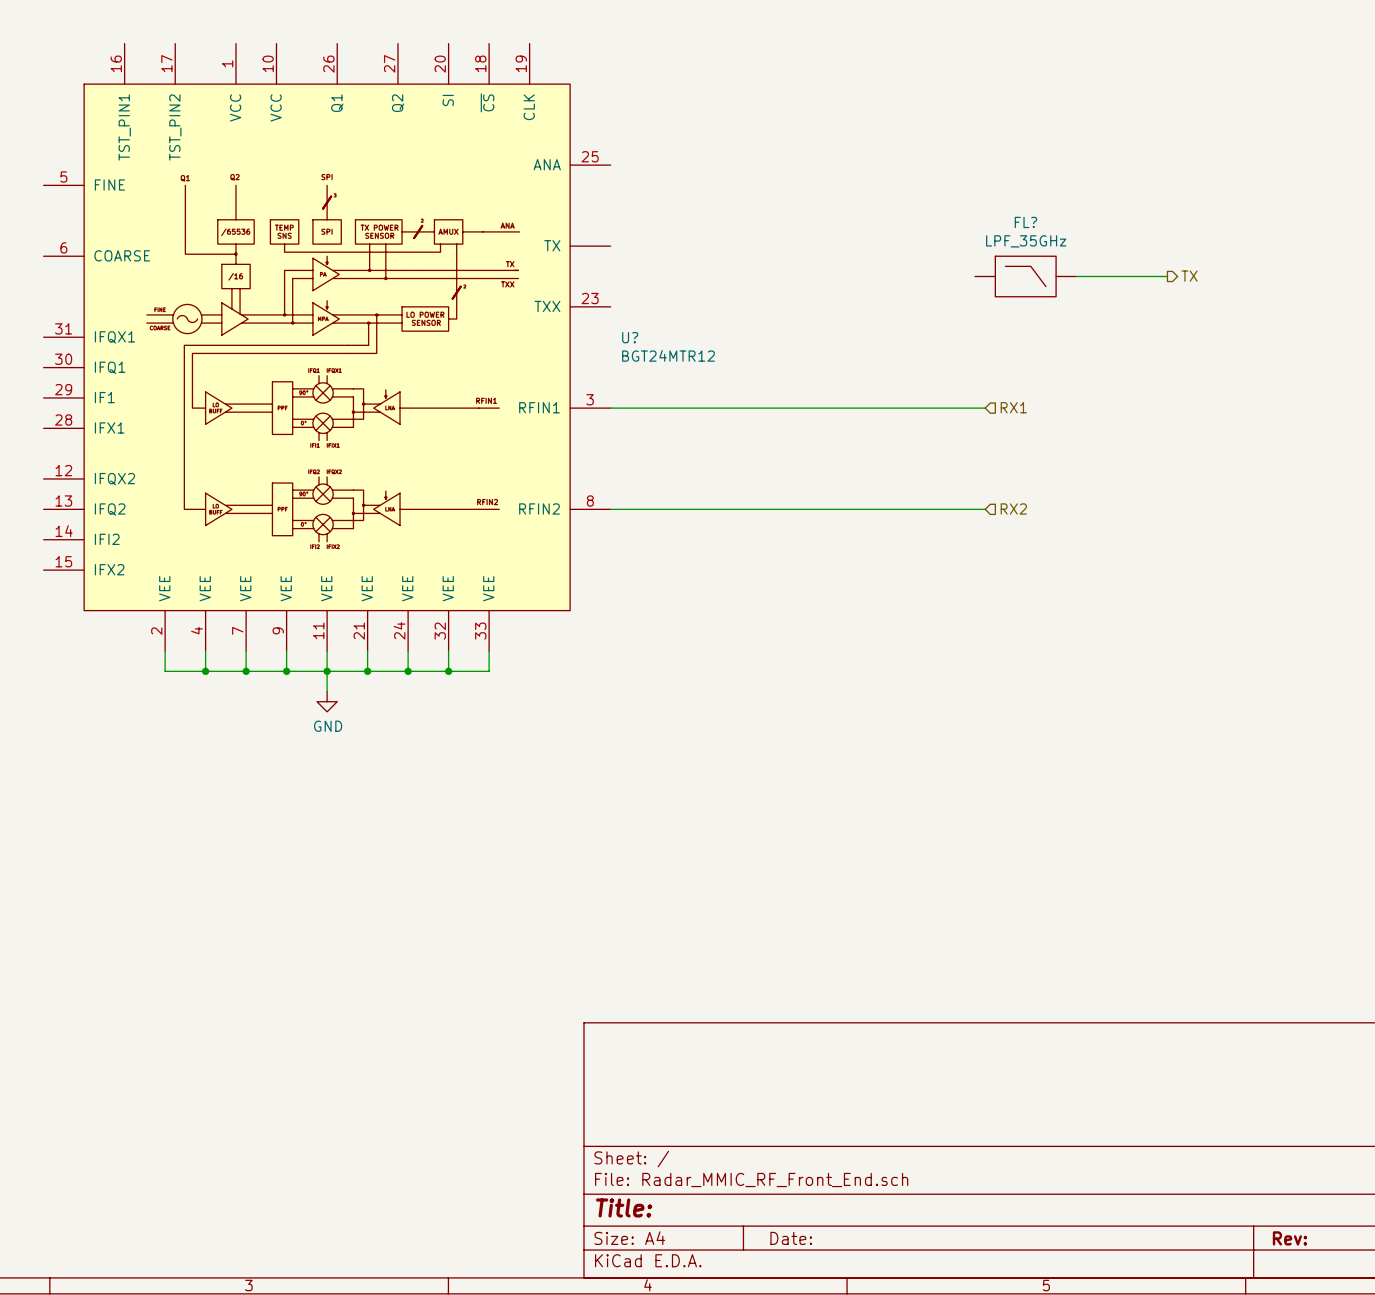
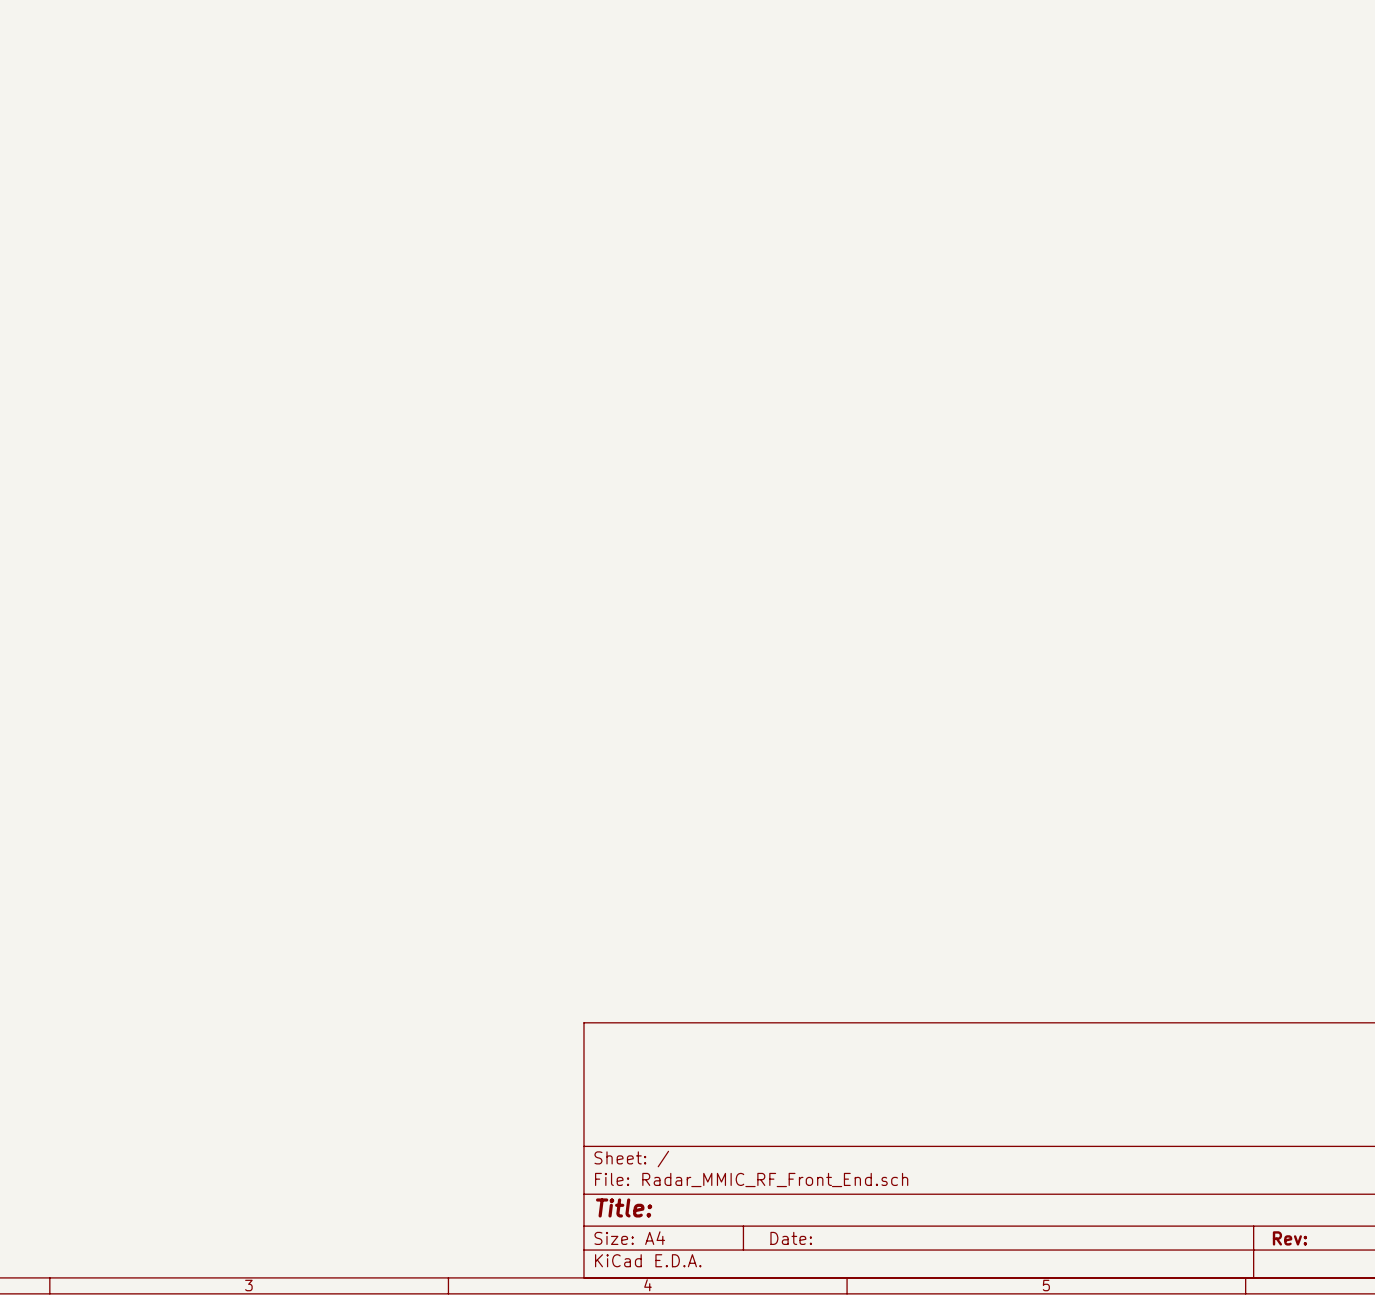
FL?: LPF_35GHz (1025, 276) -> none
wire: (1076, 276) (1167, 276) -> none
hierarchical label: TX (1189, 276) -> none
U?: BGT24MTR12 (327, 347) -> none
hierarchical label: RX1 (1013, 407) -> none
wire: (610, 408) (985, 408) -> none
hierarchical label: RX2 (1013, 508) -> none
wire: (610, 509) (985, 509) -> none
wire: (165, 651) (165, 671) (489, 671) (489, 651) -> none
wire: (205, 651) (205, 671) -> none
wire: (246, 651) (246, 671) -> none
wire: (286, 651) (286, 671) -> none
wire: (327, 651) (327, 691) -> none
wire: (367, 651) (367, 671) -> none
wire: (408, 651) (408, 671) -> none
wire: (448, 651) (448, 671) -> none
junction: (205, 671) -> none
junction: (246, 671) -> none
junction: (286, 671) -> none
junction: (327, 671) -> none
junction: (367, 671) -> none
junction: (408, 671) -> none
junction: (448, 671) -> none
power symbol: GND (327, 701) -> none

